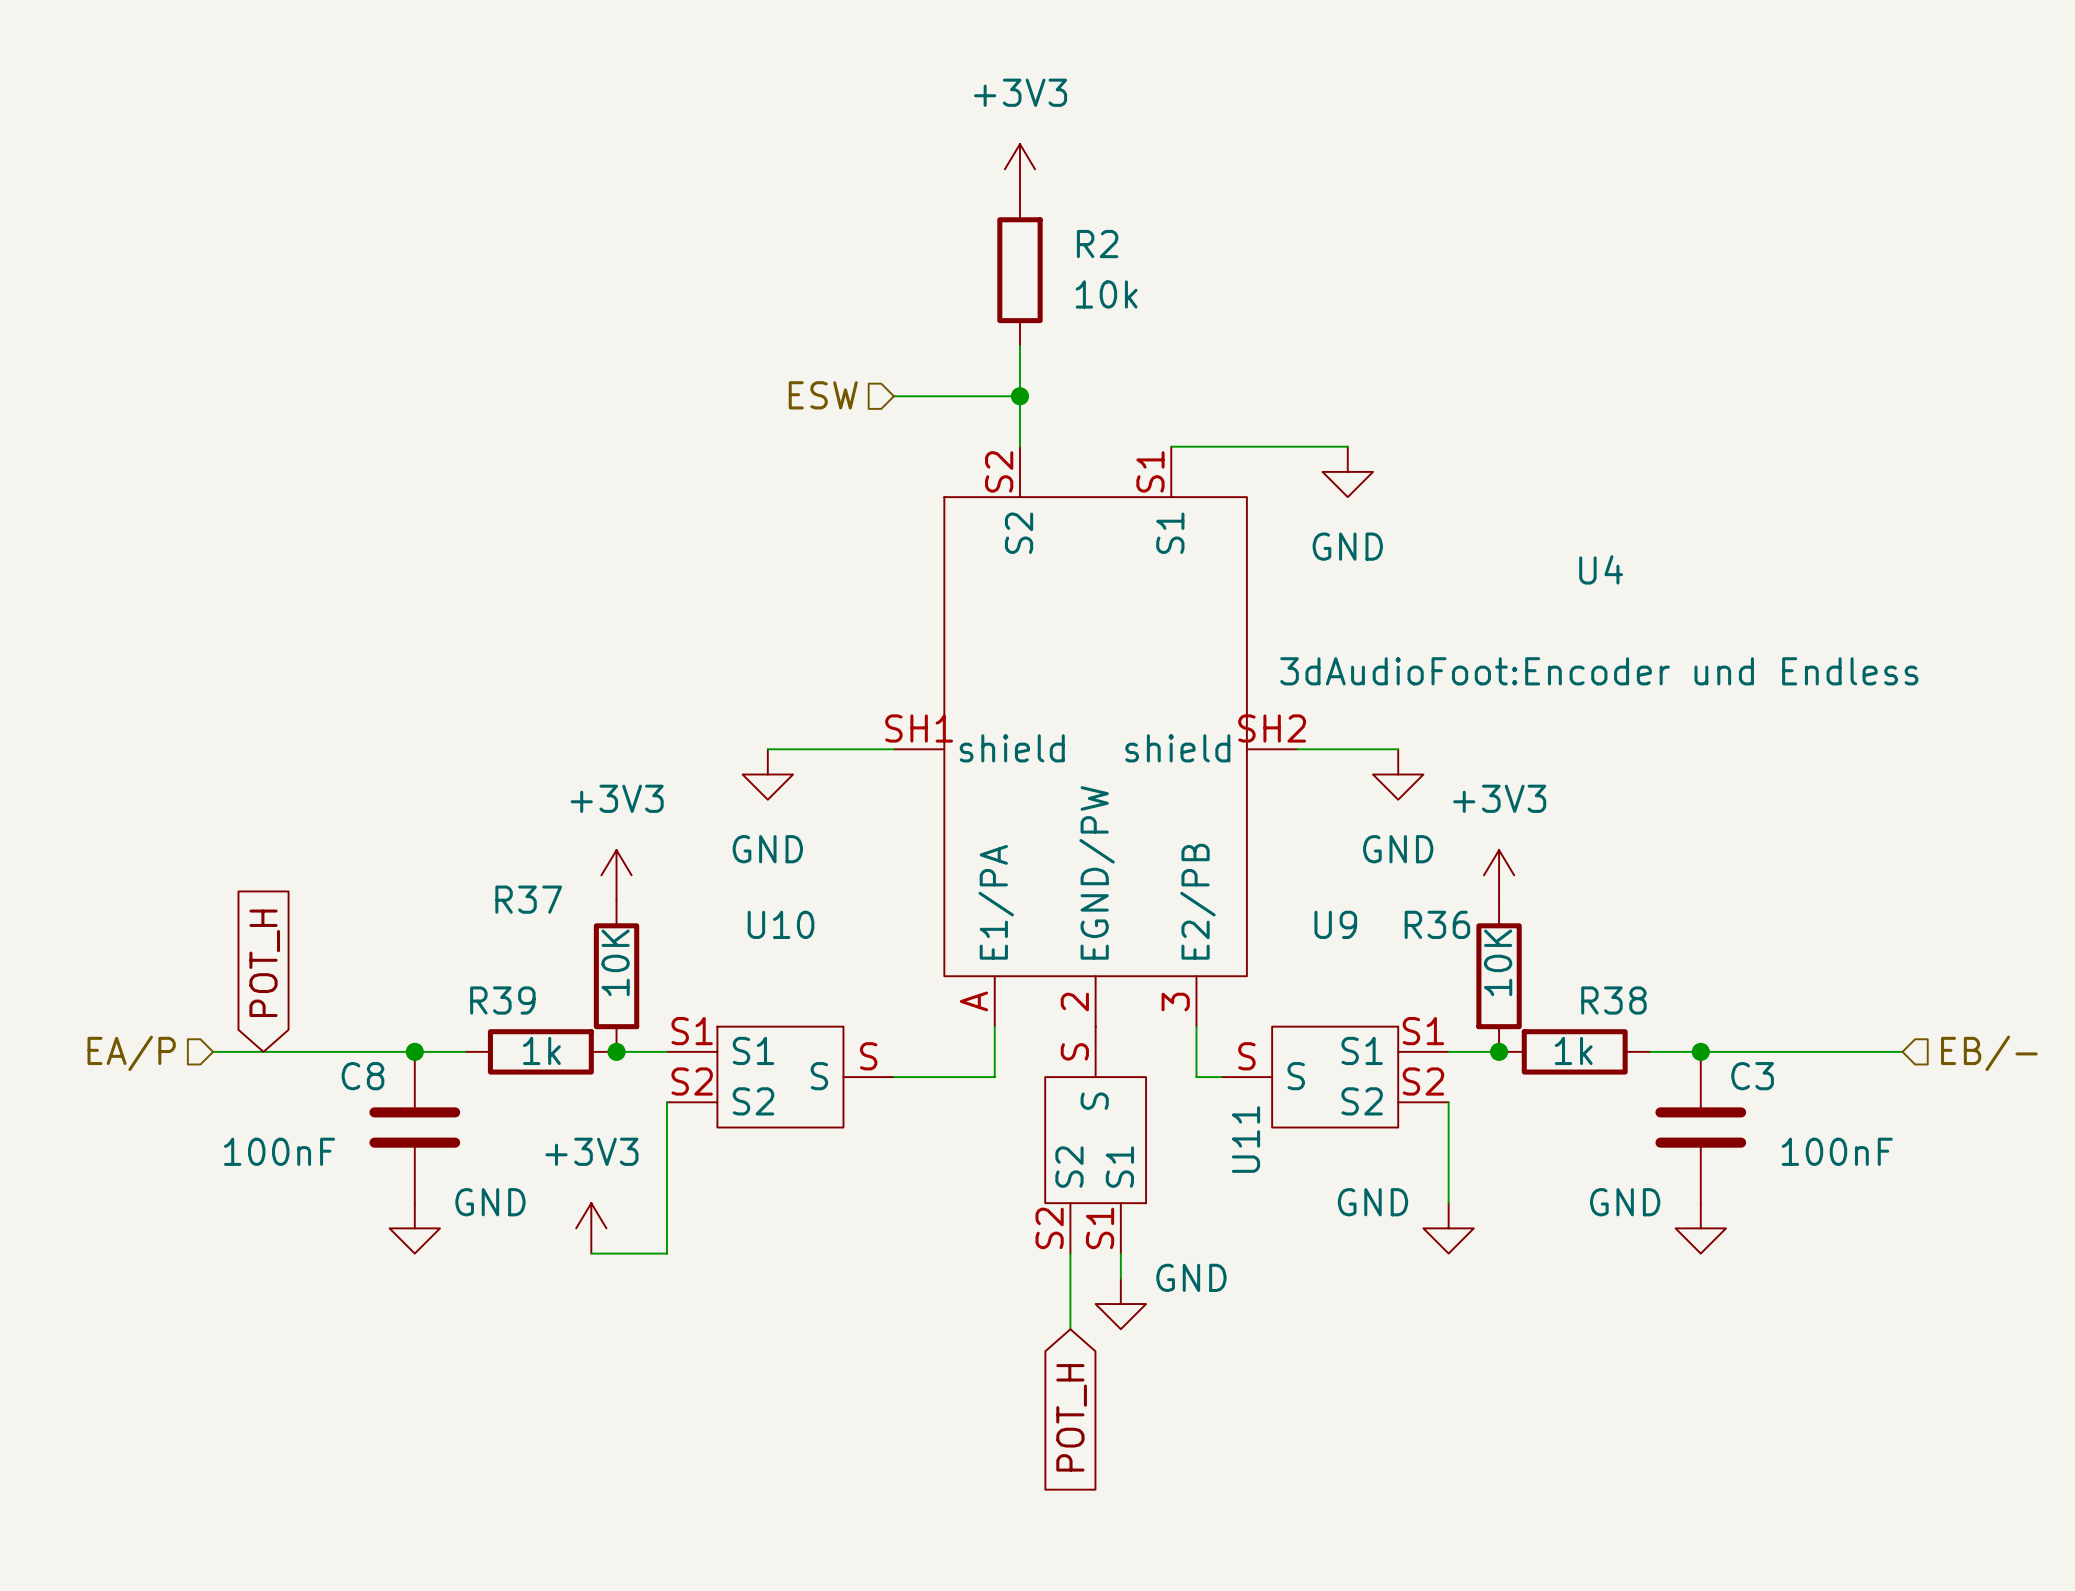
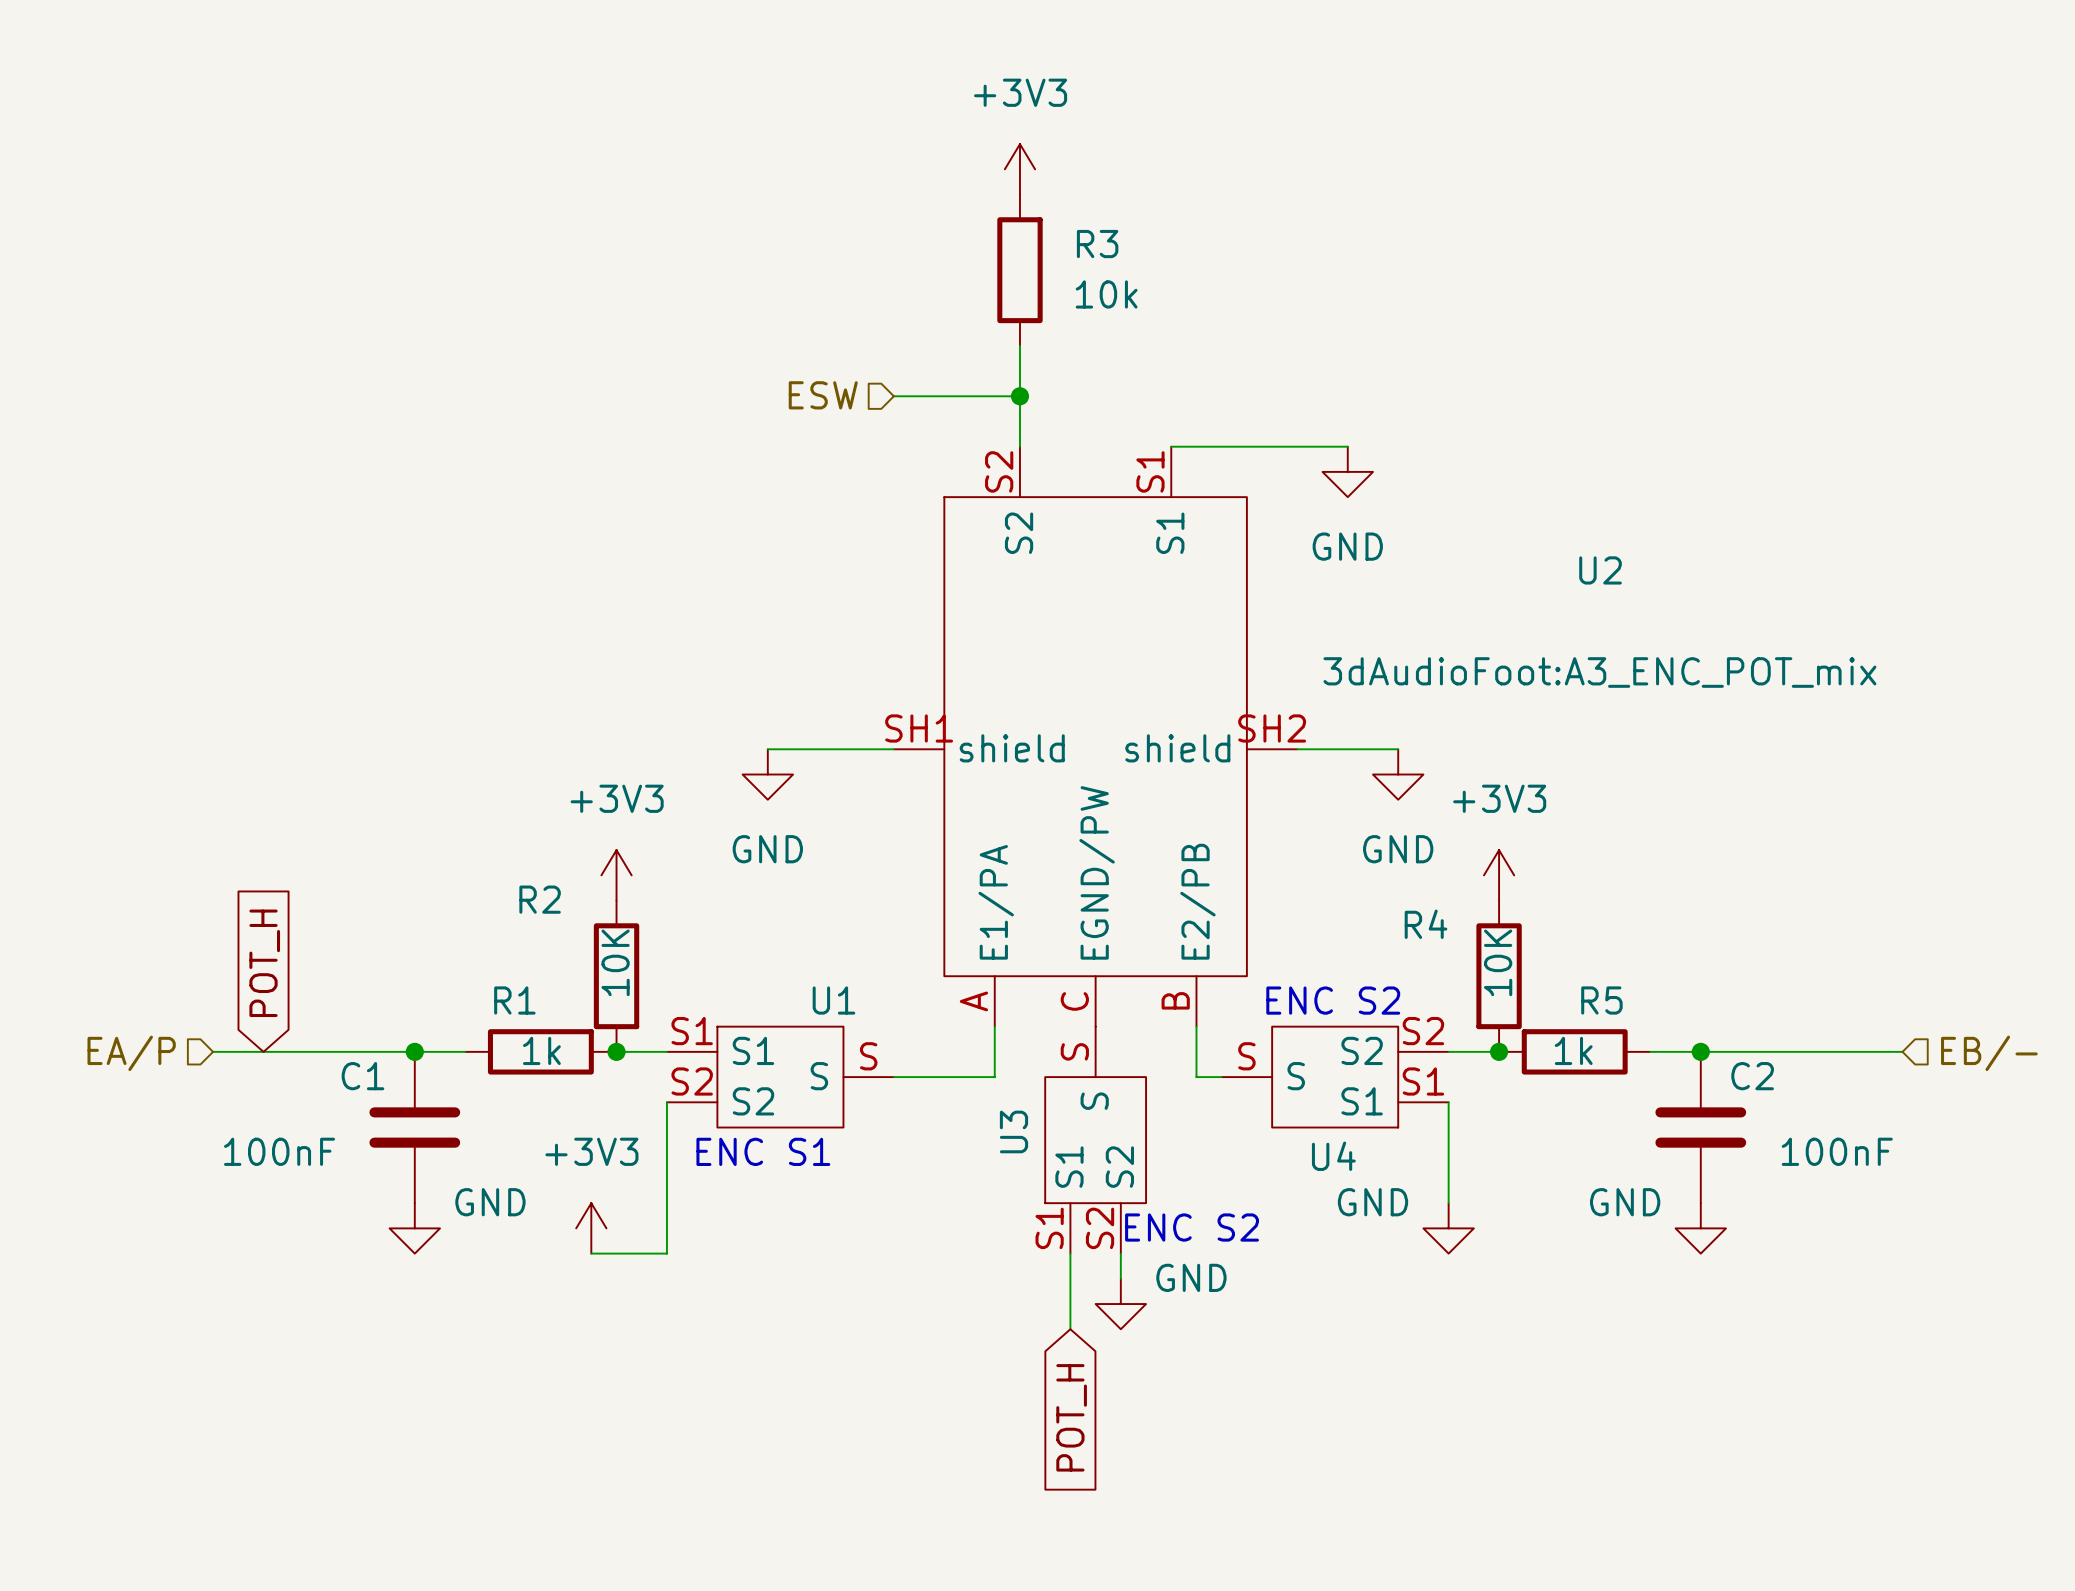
R2 name: R2 (1097, 244) -> R3 (1097, 244)
U4 symbol: [893, 446, 1298, 1027] -> [1221, 1026, 1449, 1128]
U4 name position: U4 (1601, 569) -> U4 (1333, 1156)
U4 text: 3dAudioFoot:Encoder und Endless (1599, 671) -> none
U2: none -> (1095, 736)
R37 name: R37 (528, 899) -> R2 (540, 899)
U10 name: U10 (781, 924) -> U1 (833, 1000)
R36 name: R36 (1437, 924) -> R4 (1426, 924)
R39 name: R39 (502, 1000) -> R1 (514, 1000)
text: none -> ENC S2 (1333, 1000)
R38 name: R38 (1613, 1000) -> R5 (1601, 1000)
C8 name: C8 (362, 1076) -> C1 (362, 1076)
C3 name: C3 (1752, 1076) -> C2 (1752, 1076)
U9: (1335, 1077) -> none
U11 name: U11 (1245, 1139) -> U3 (1013, 1131)
U11 flip: as is (1095, 1140) -> left-right (1095, 1140)
text: none -> ENC S1 (763, 1151)
text: none -> ENC S2 (1192, 1227)

